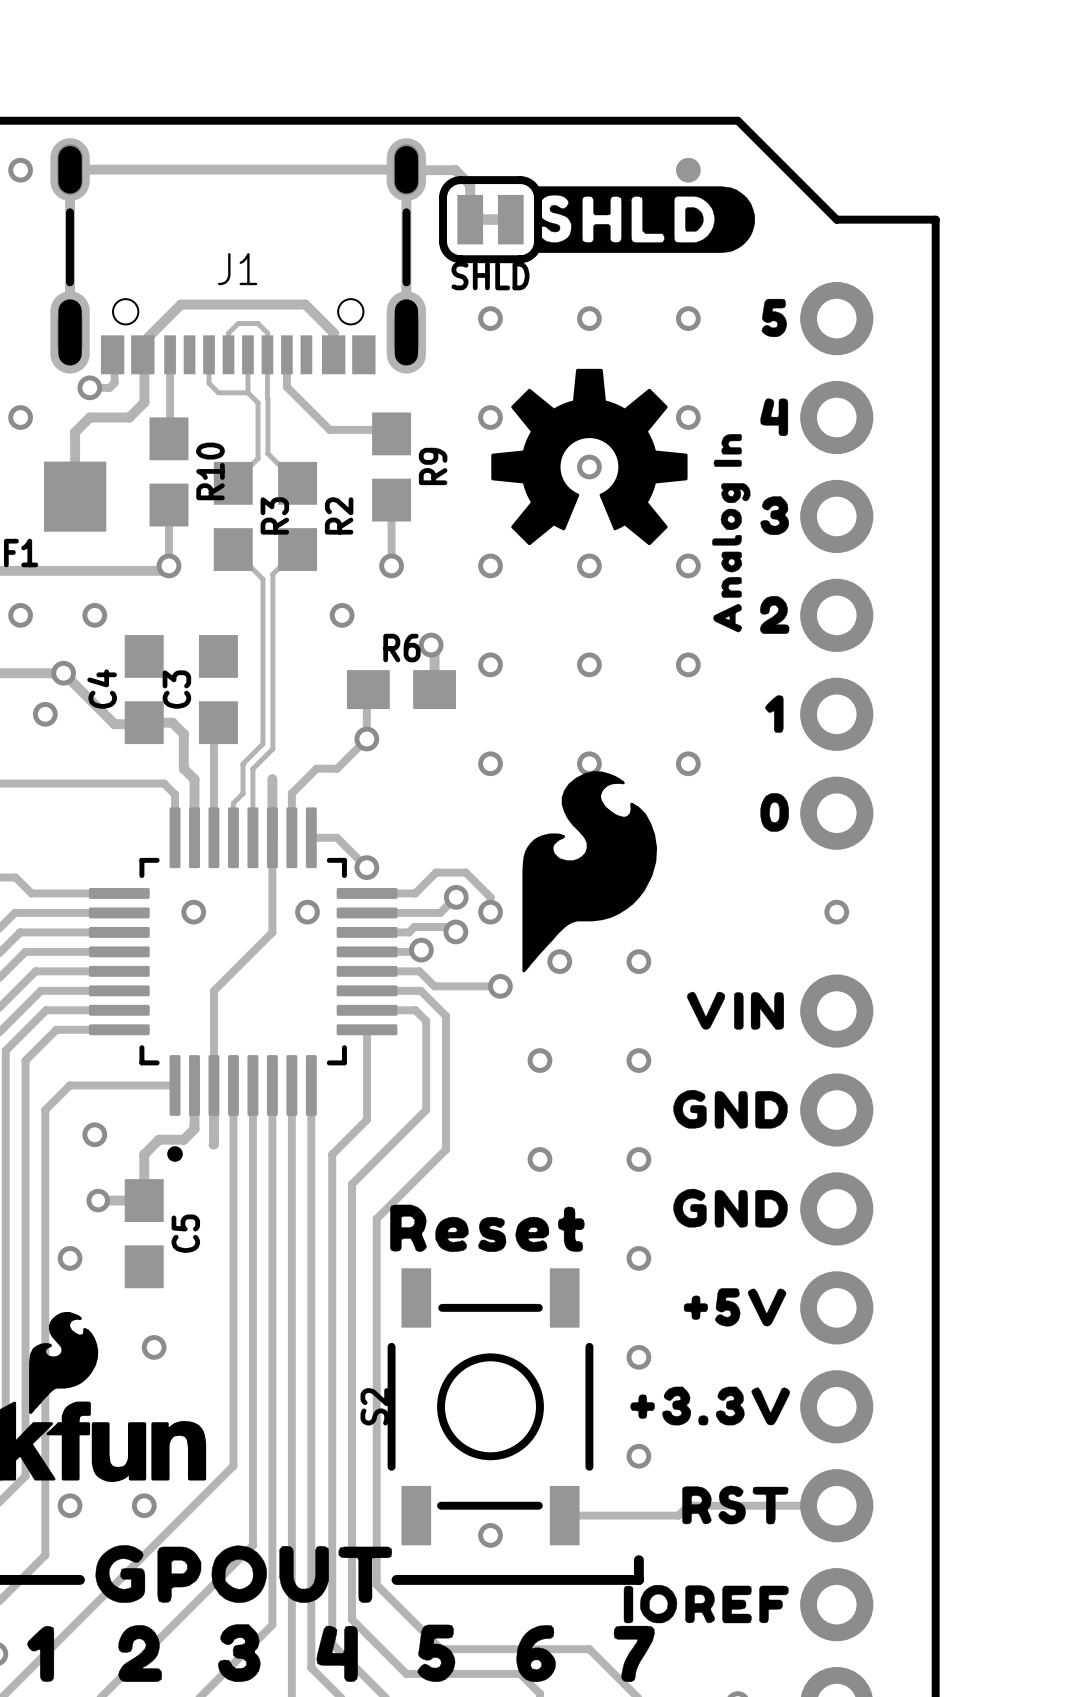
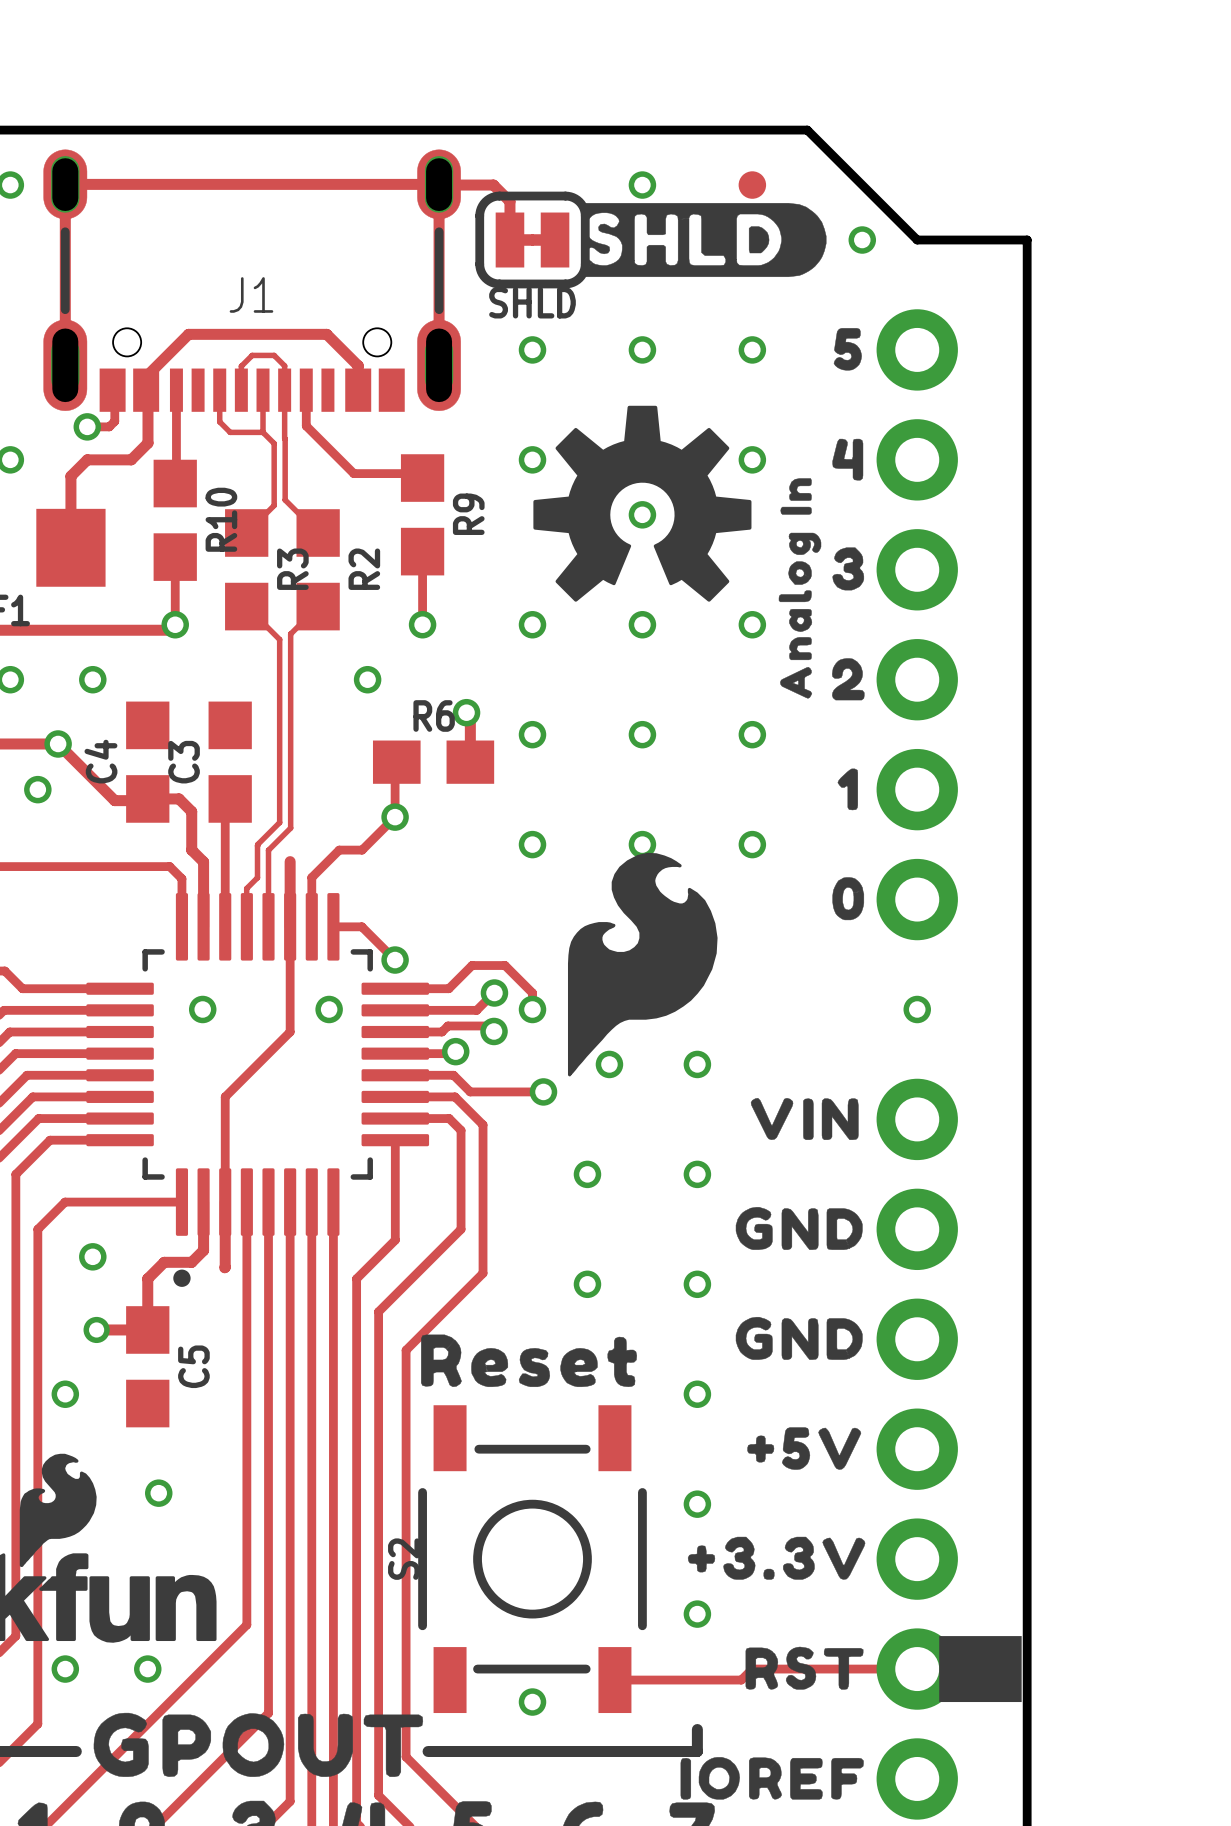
via: none -> (642, 185)
via: none -> (862, 240)
drawing: none -> [939, 1636, 1022, 1703]

